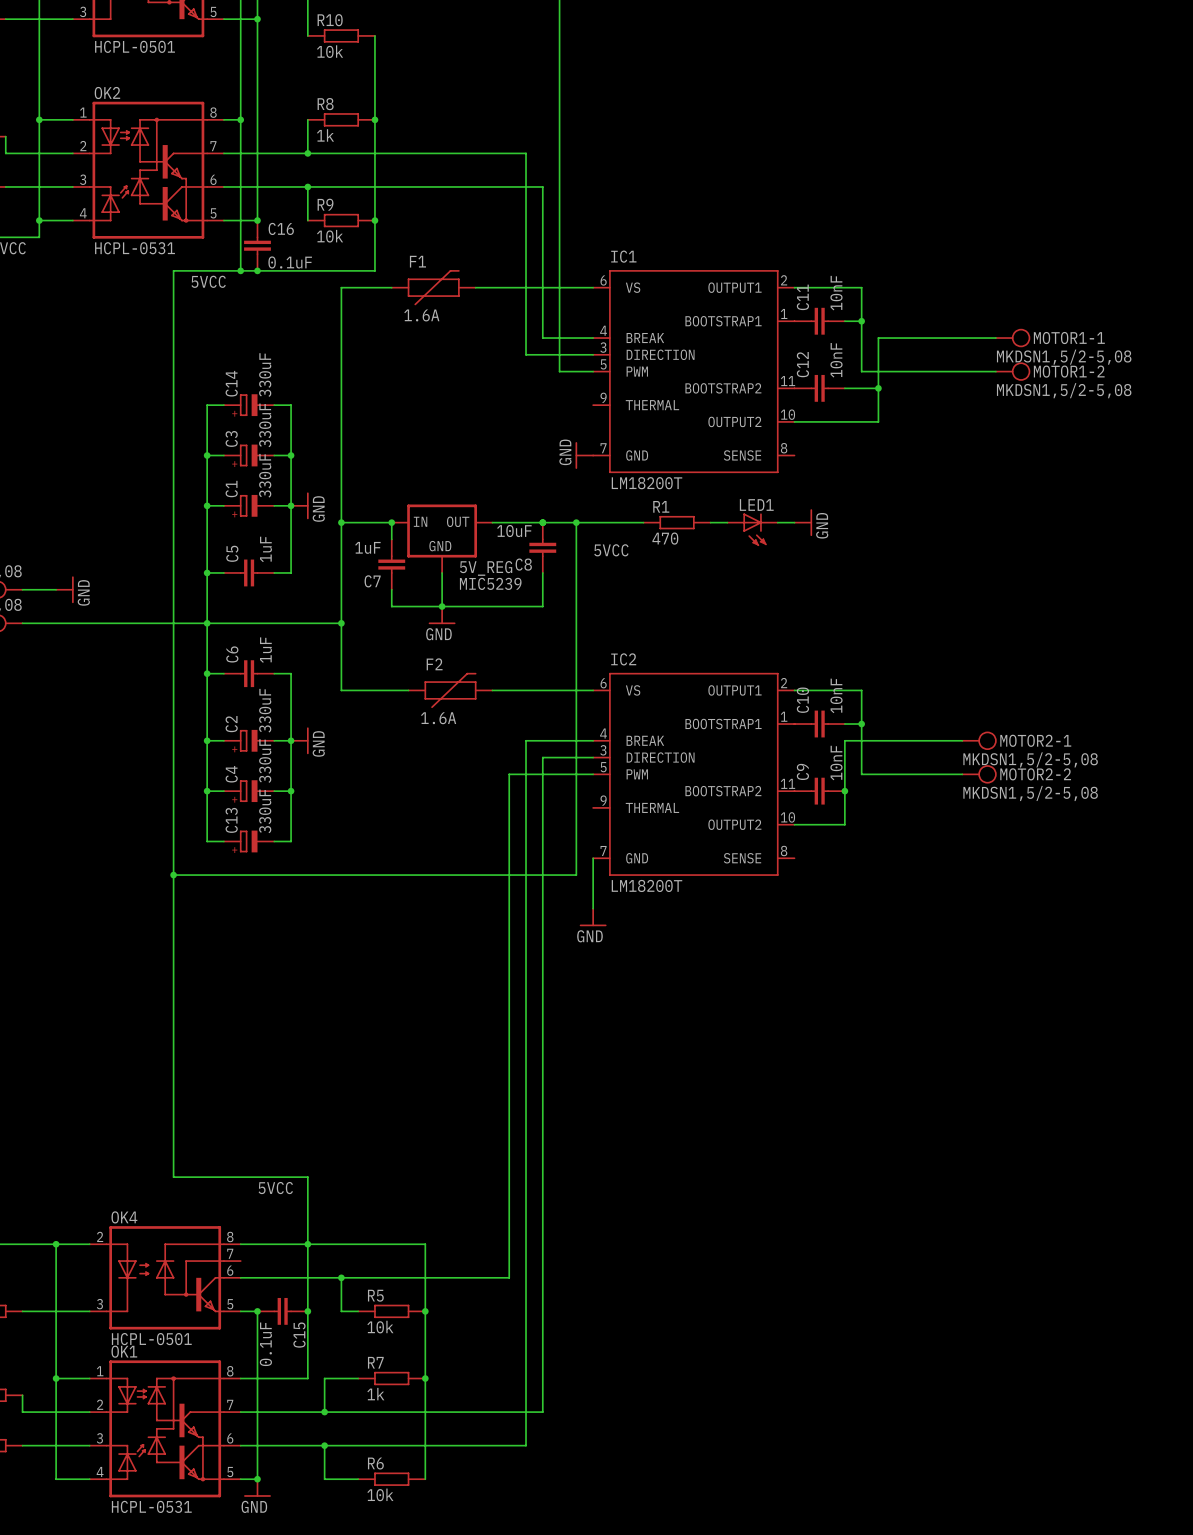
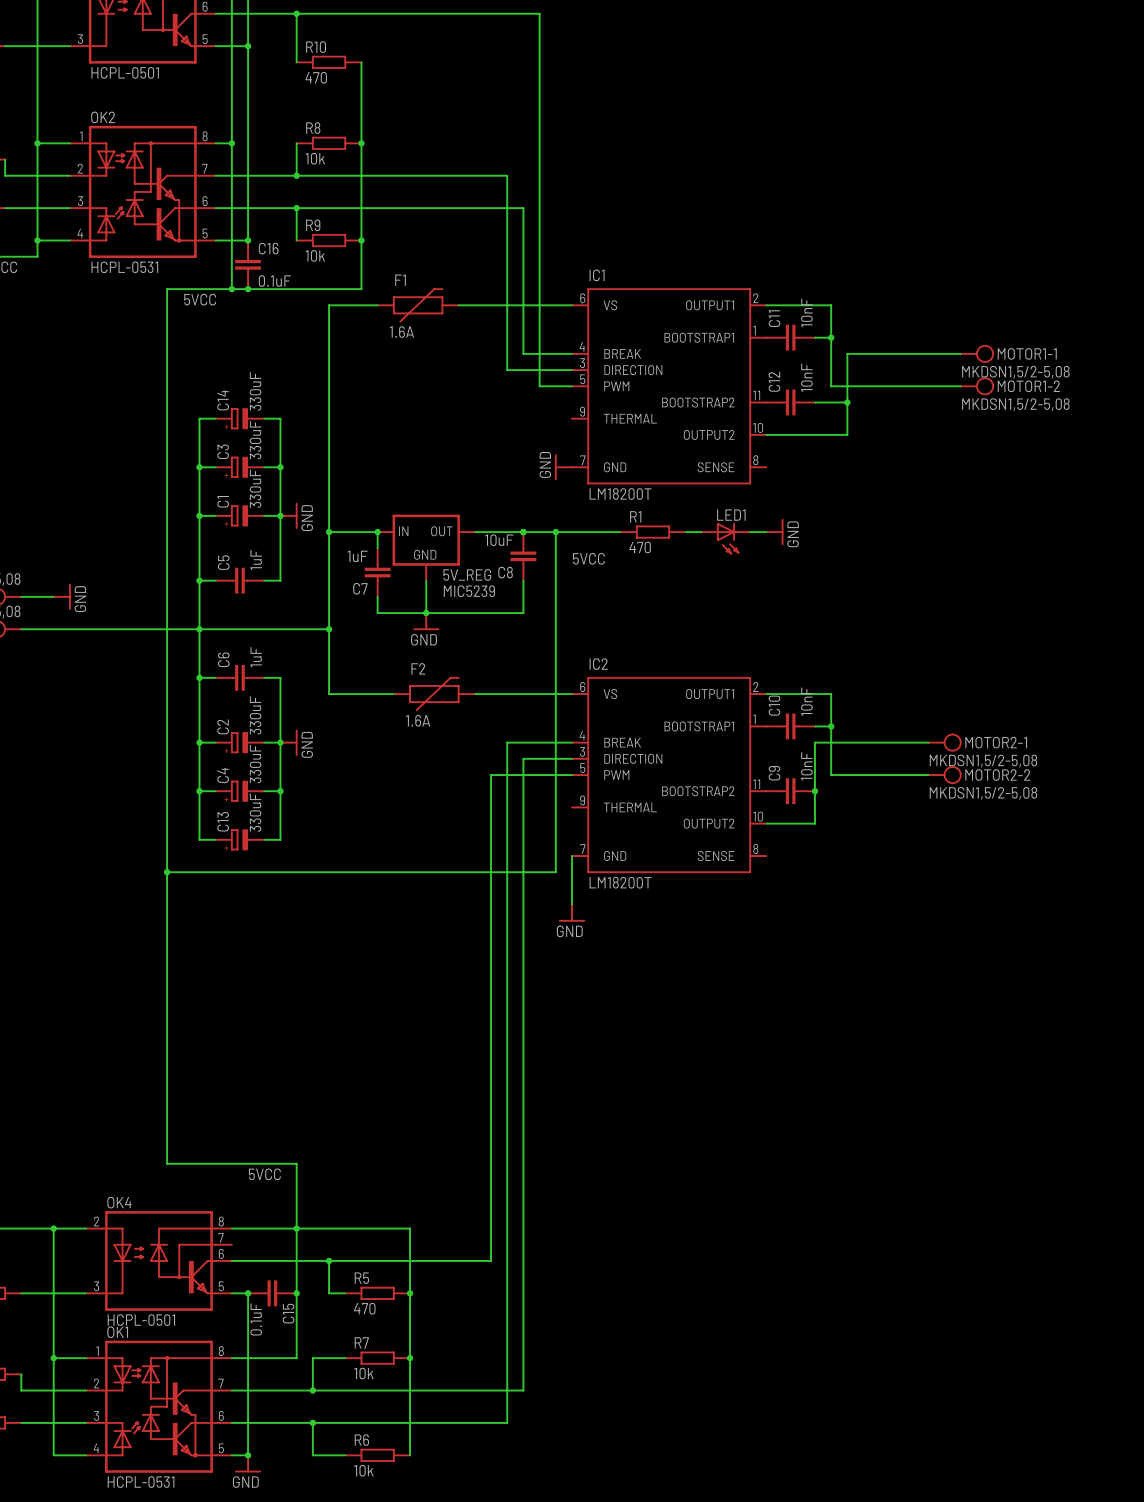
R10 value: 10k (330, 51) -> 470 (316, 77)
R8 value: 1k (325, 135) -> 10k (315, 158)
R5 value: 10k (380, 1327) -> 470 (364, 1308)
R7 value: 1k (375, 1394) -> 10k (363, 1373)

